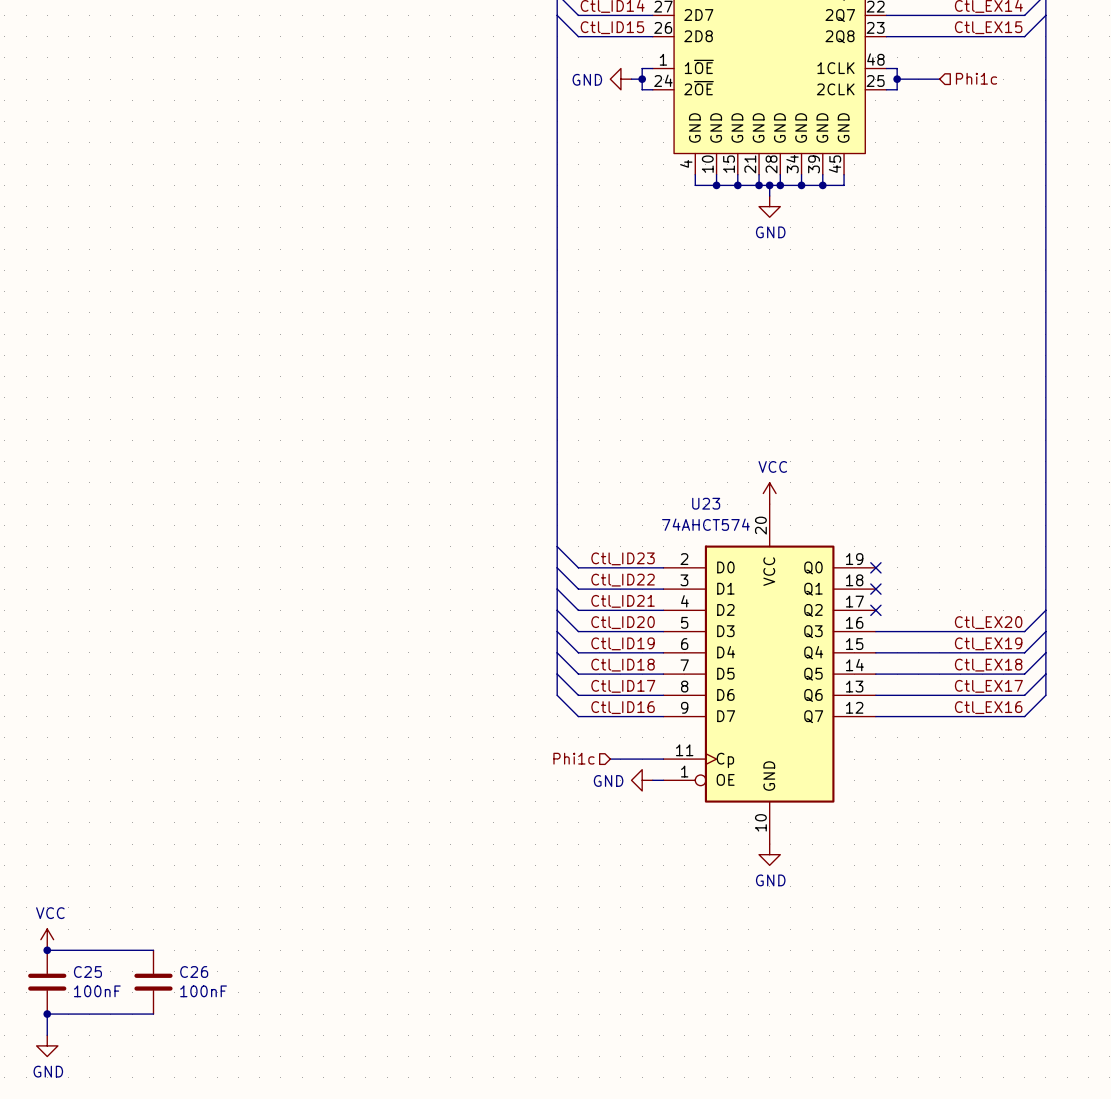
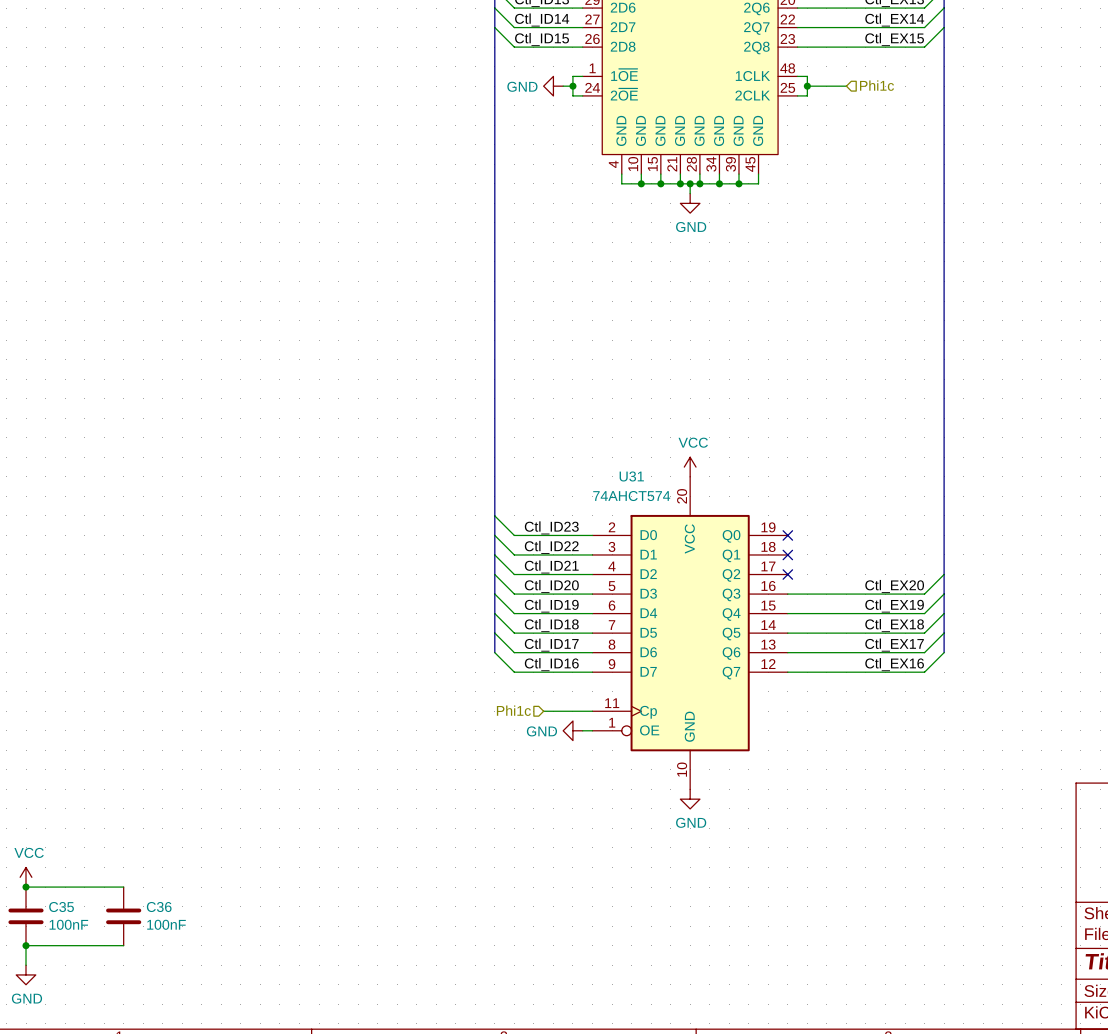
U23 name: U23 (706, 503) -> U31 (631, 476)
C25 name: C25 (87, 972) -> C35 (61, 907)
C26 name: C26 (194, 972) -> C36 (159, 907)

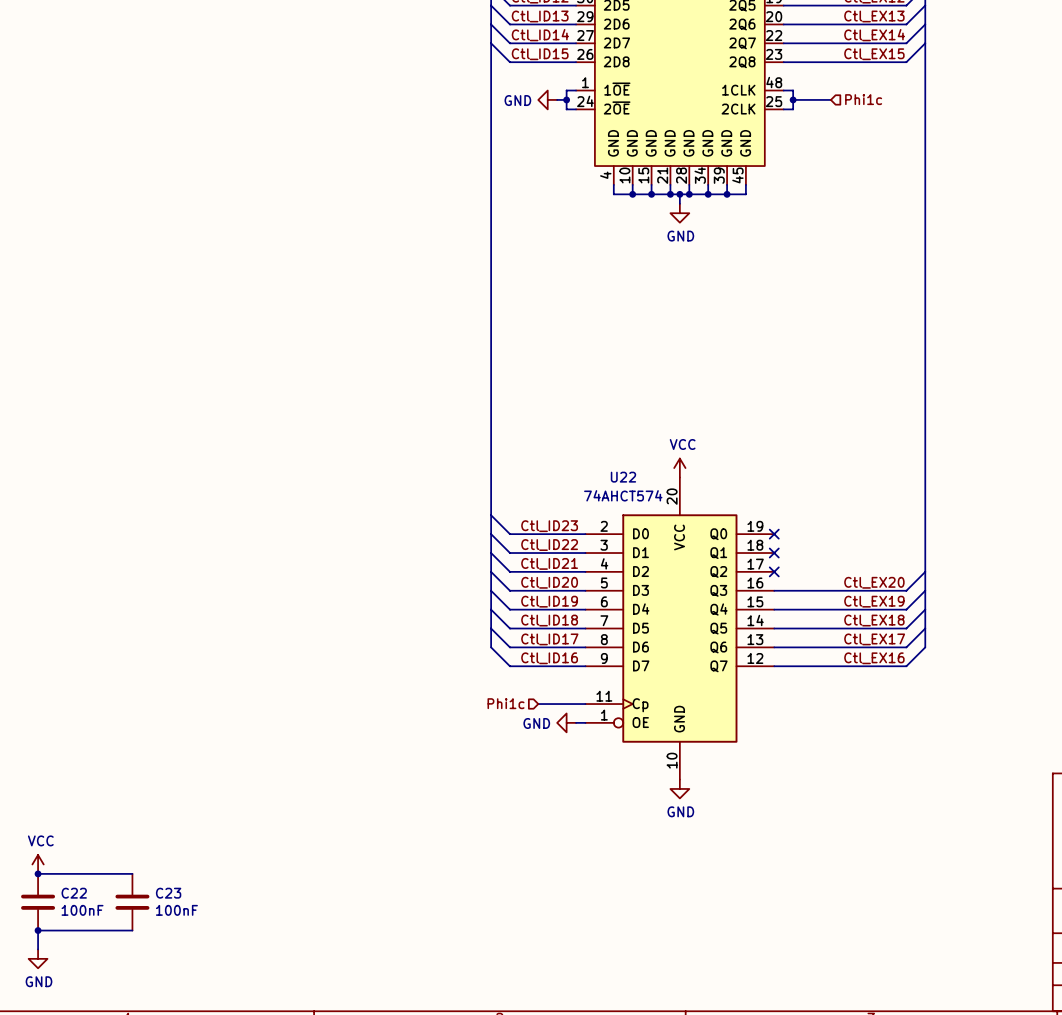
U31 name: U31 (631, 476) -> U22 (623, 477)
C35 name: C35 (61, 907) -> C22 (74, 893)
C36 name: C36 (159, 907) -> C23 (168, 893)

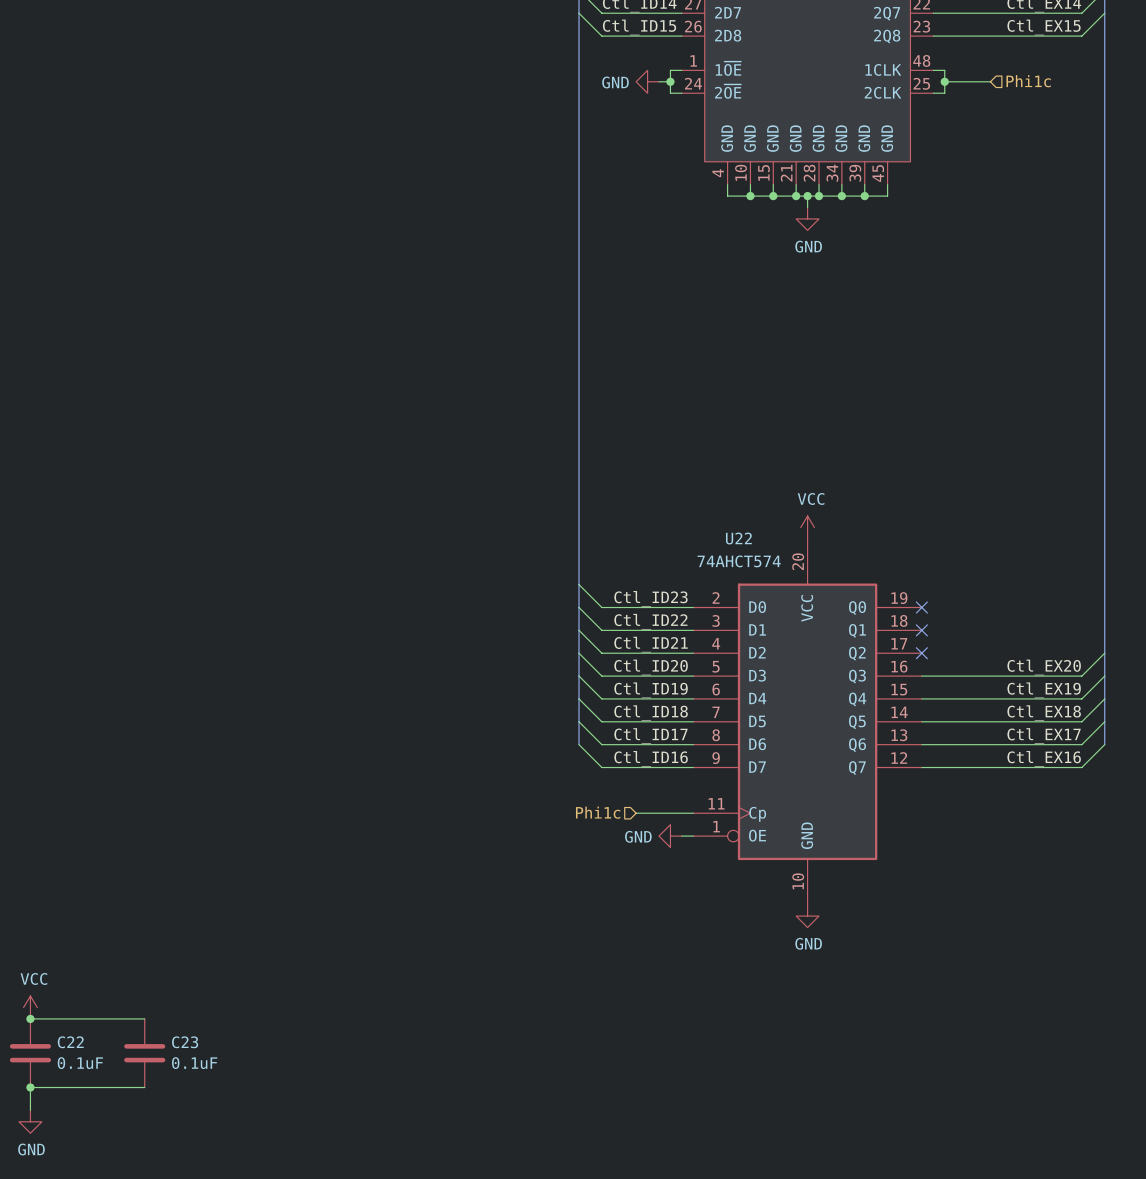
C22 value: 100nF (82, 910) -> 0.1uF (80, 1063)
C23 value: 100nF (176, 910) -> 0.1uF (194, 1063)

